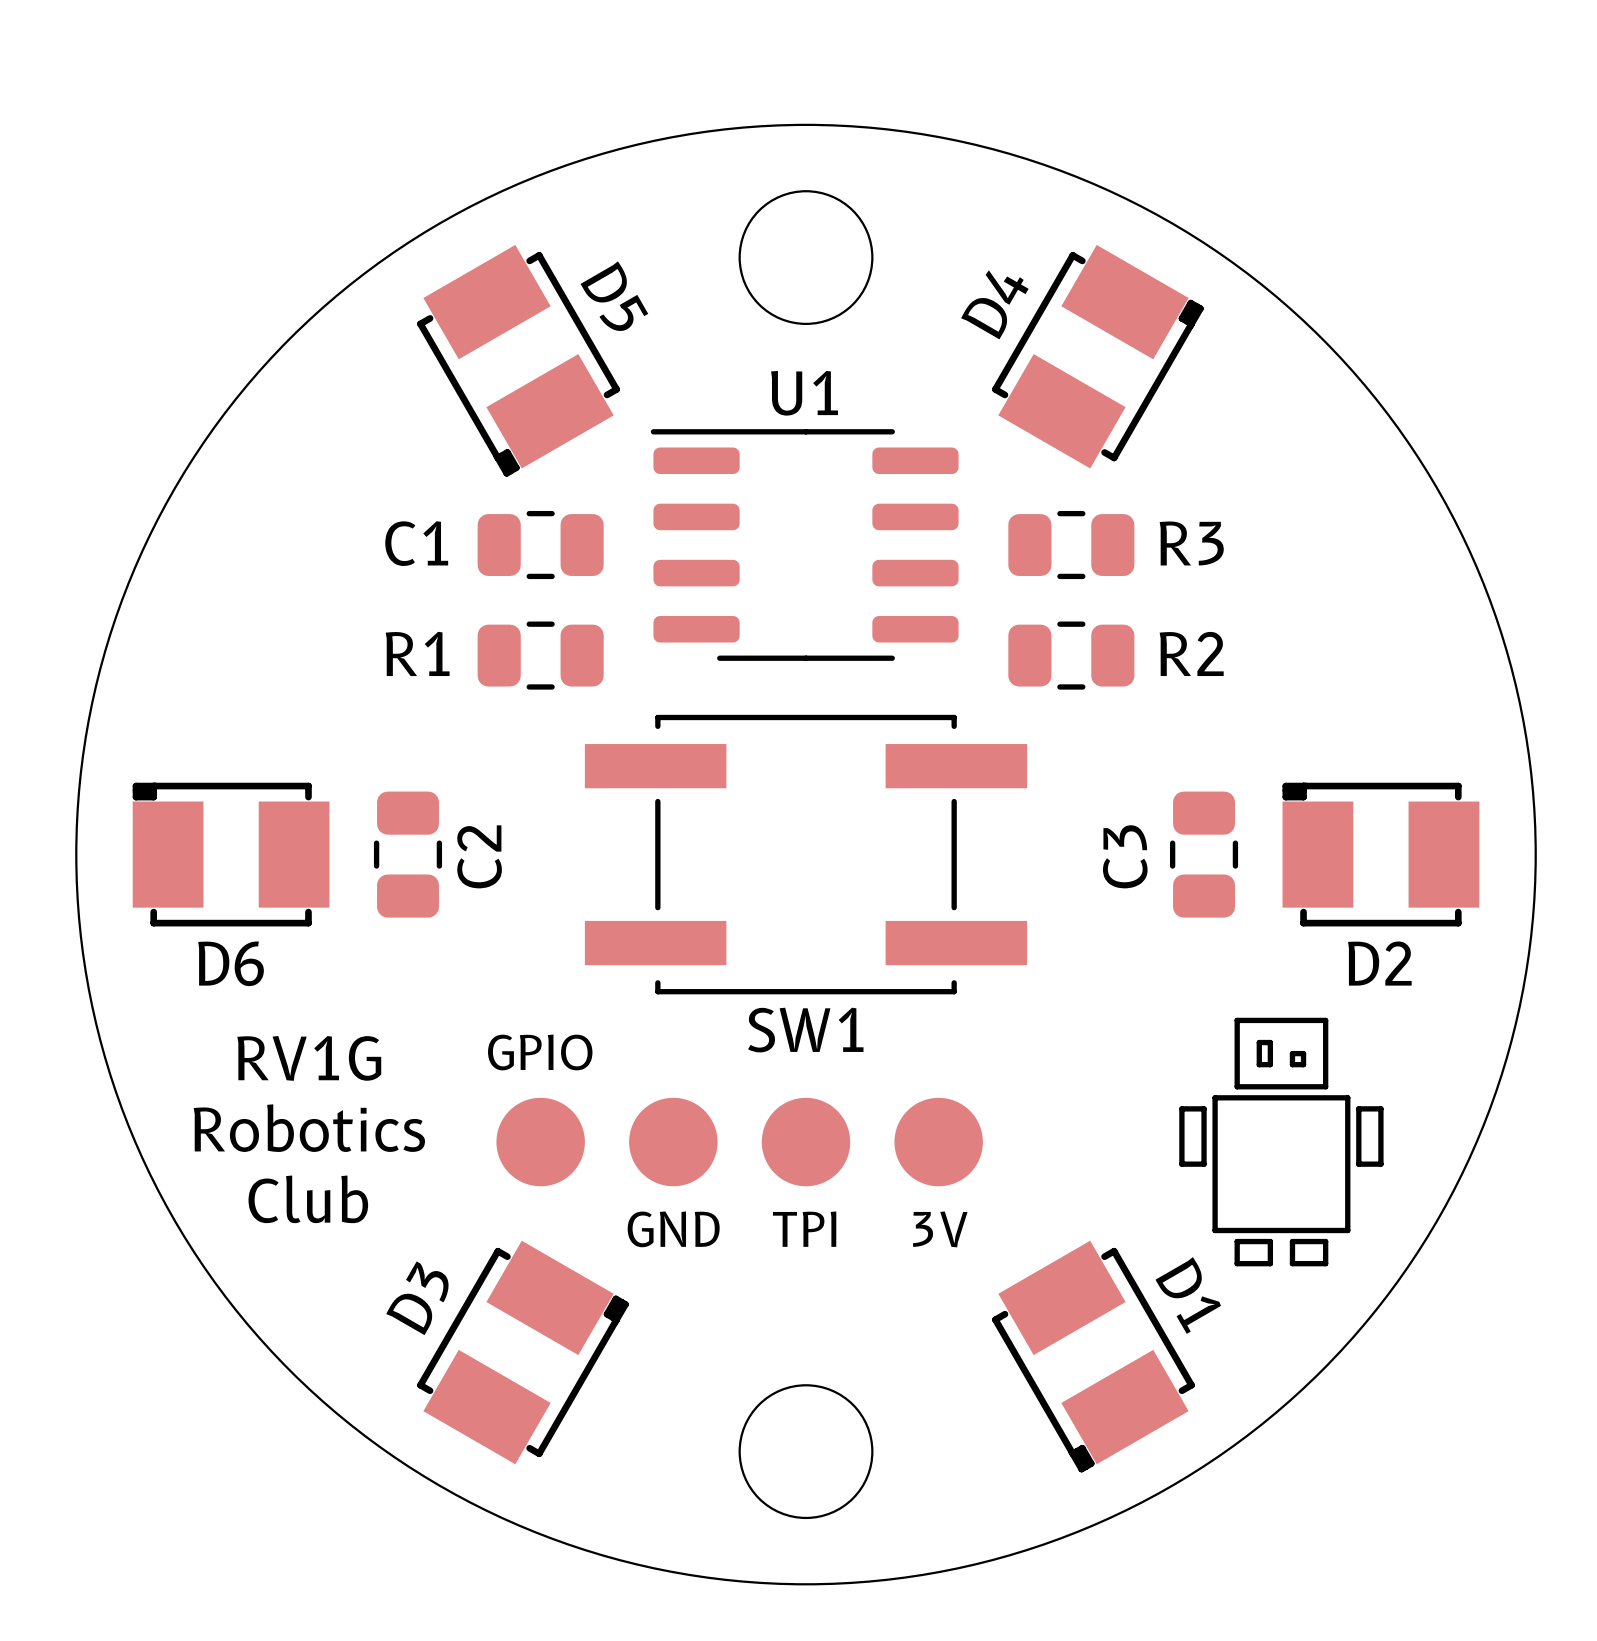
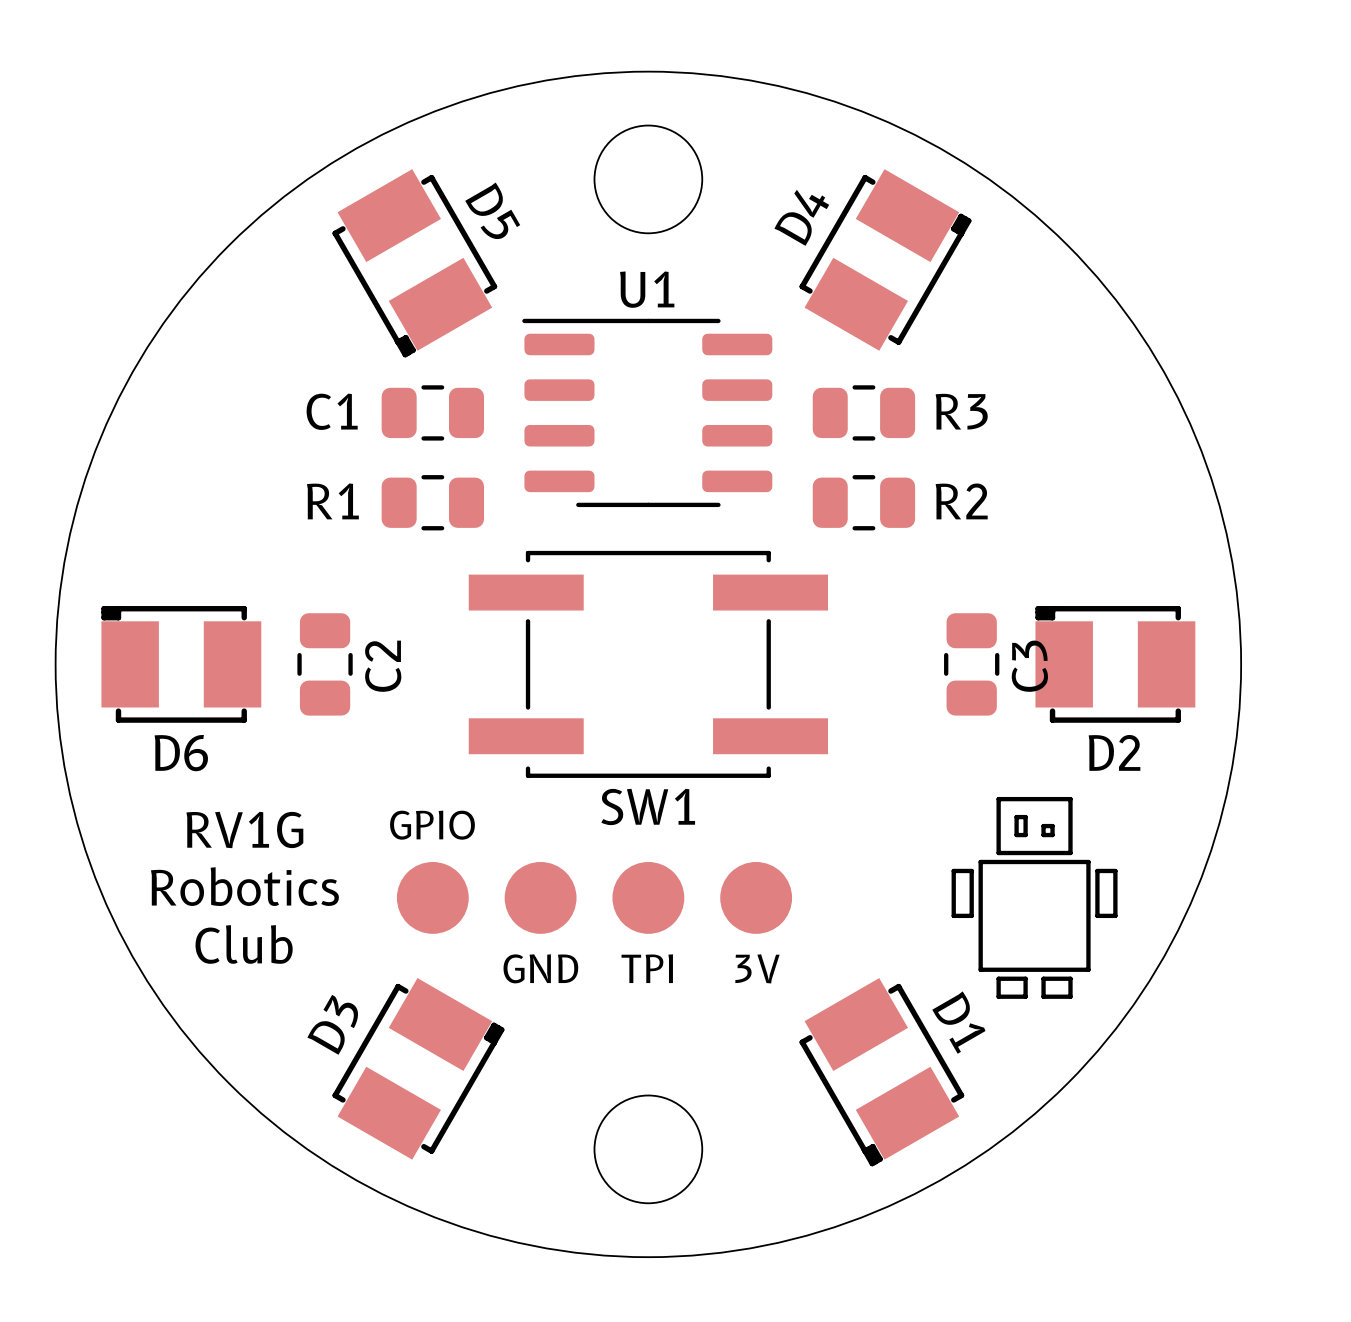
C3 name position: C3 (1125, 856) -> C3 (1029, 666)

